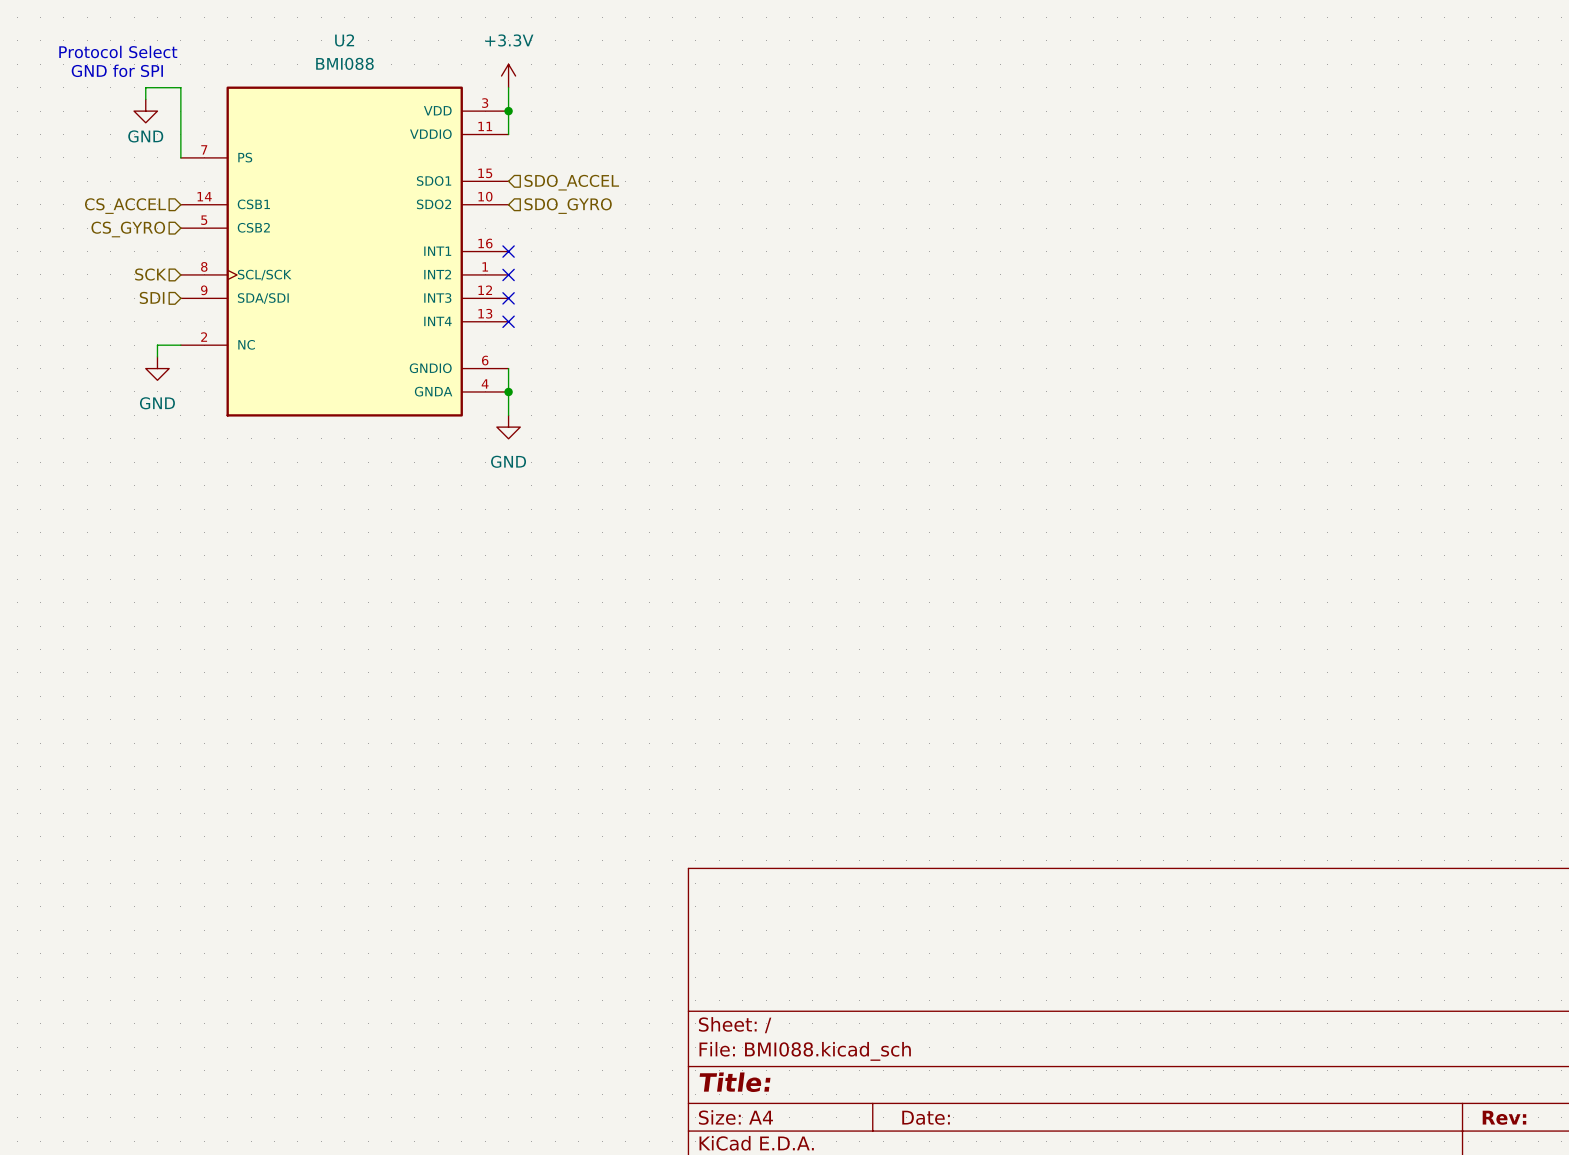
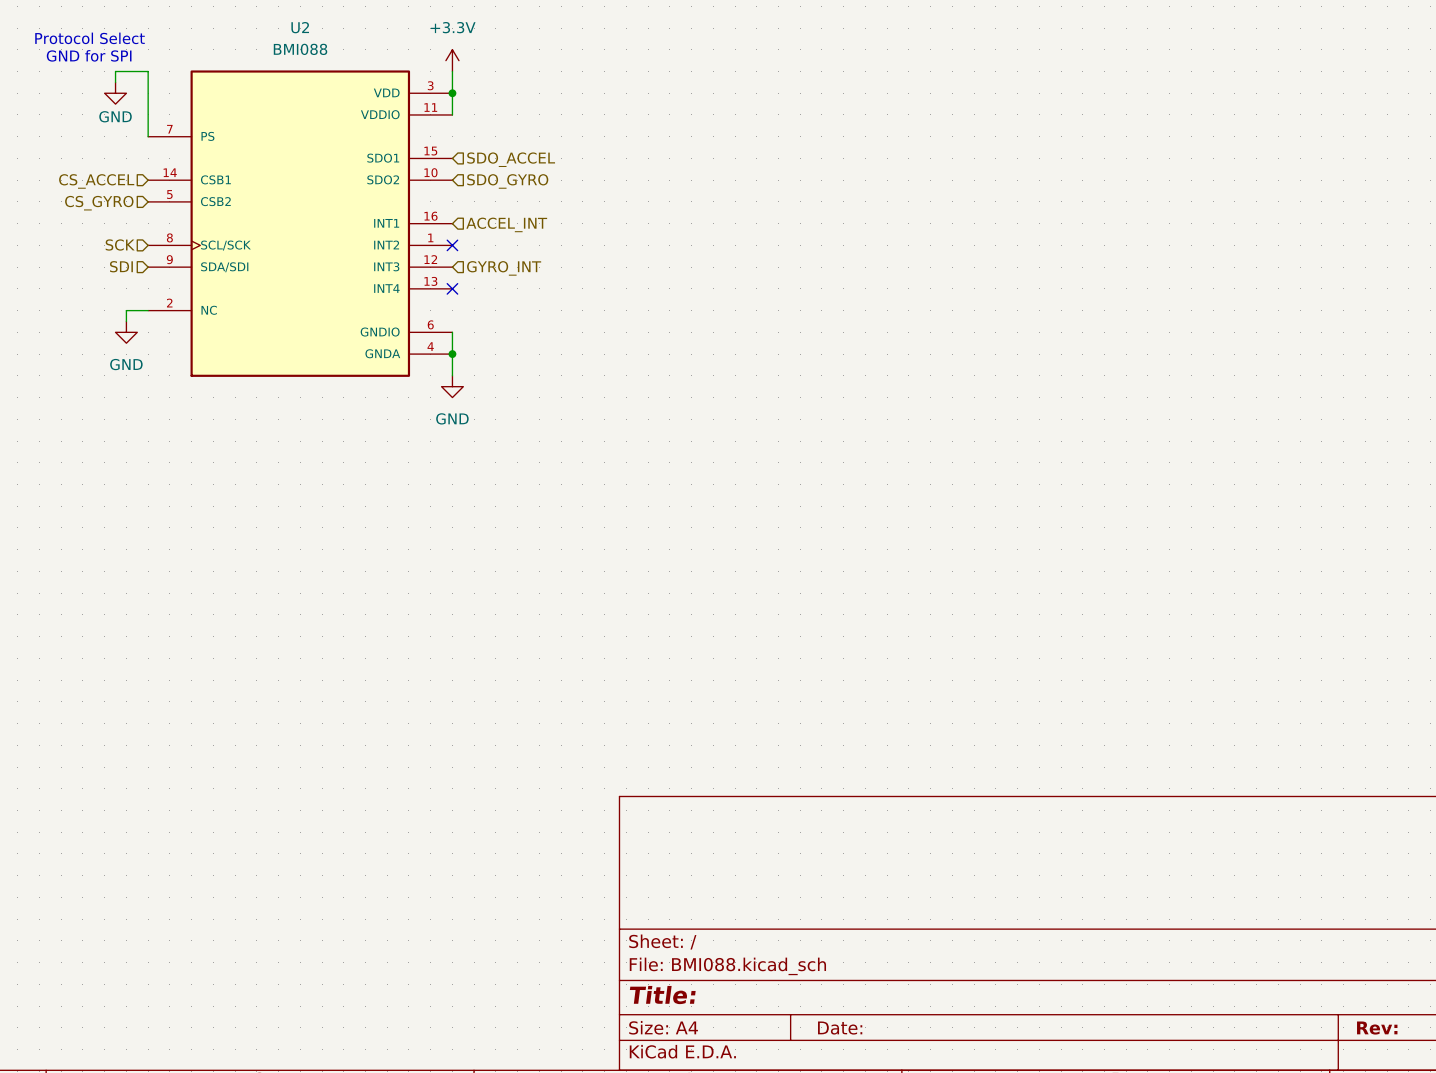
no-connect mark: (508, 251) -> none
hierarchical label: none -> ACCEL_INT (506, 224)
no-connect mark: (508, 298) -> none
hierarchical label: none -> GYRO_INT (504, 268)

